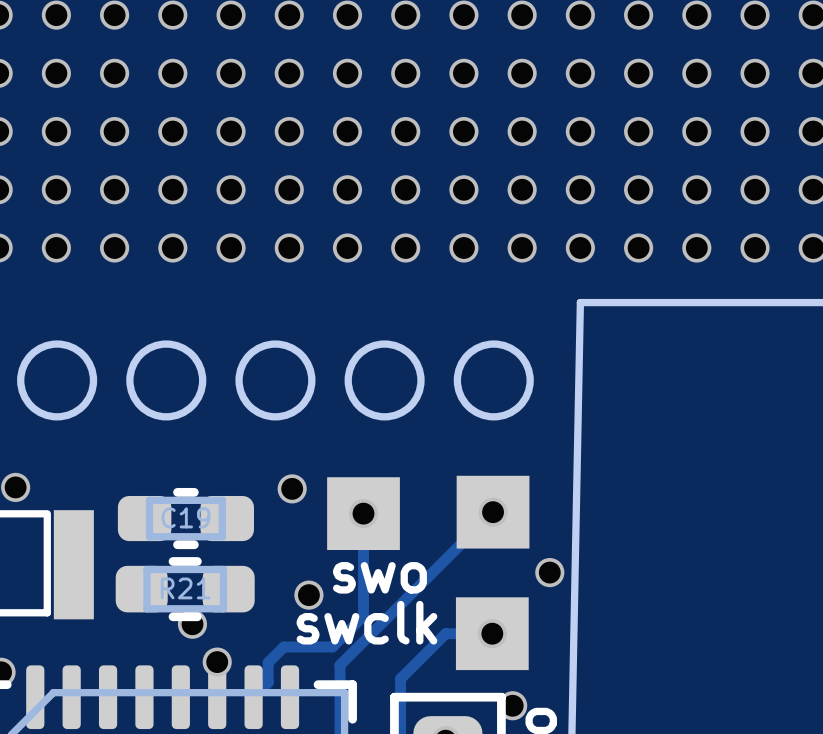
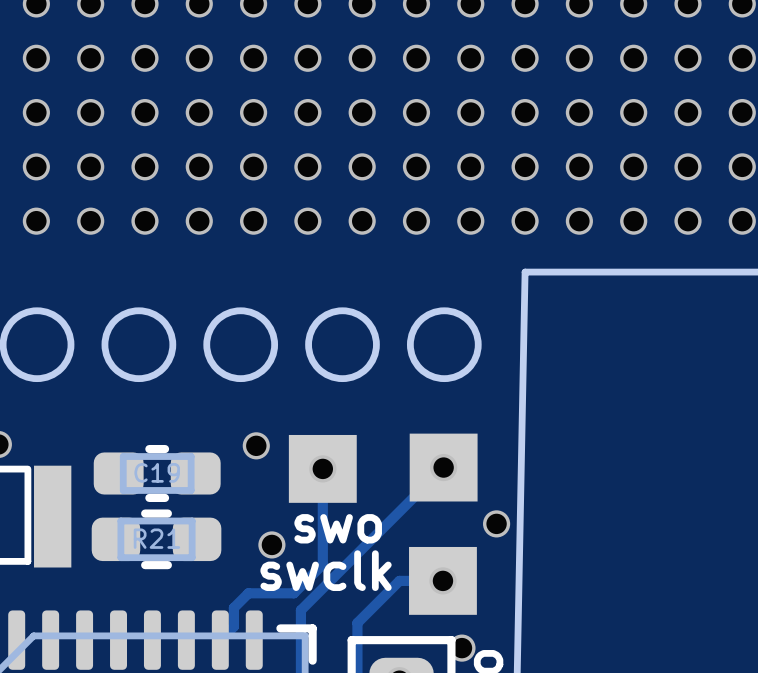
via: (192, 624) -> none
via: (217, 662) -> none

